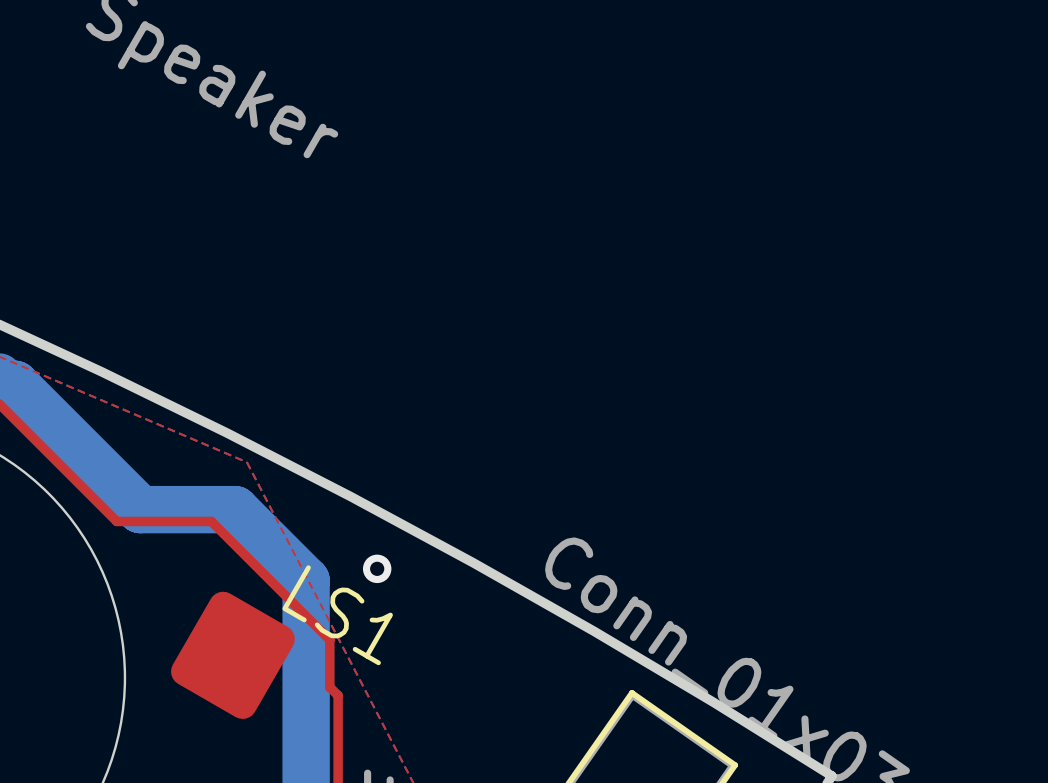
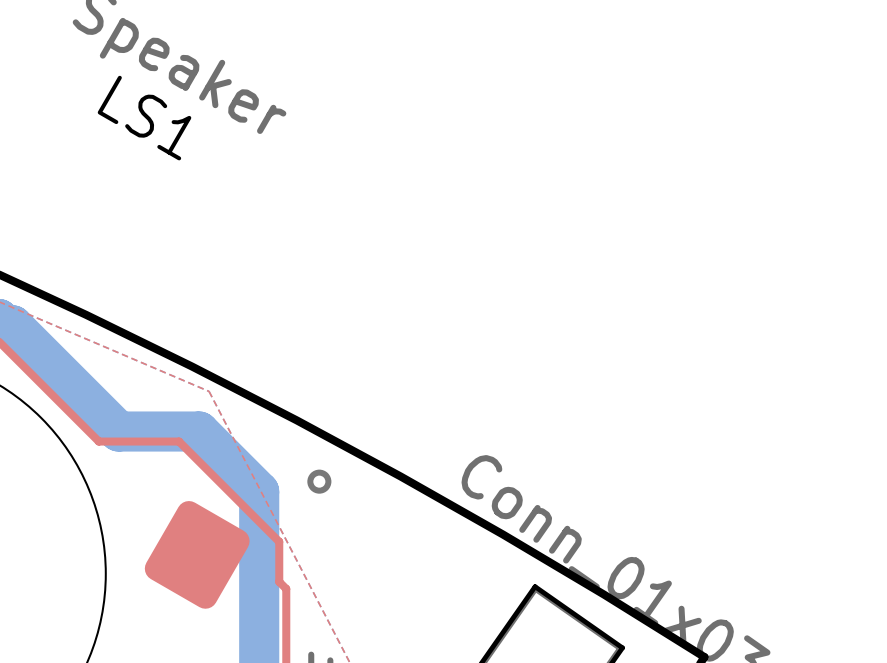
LS1 name position: LS1 (337, 615) -> LS1 (144, 118)

